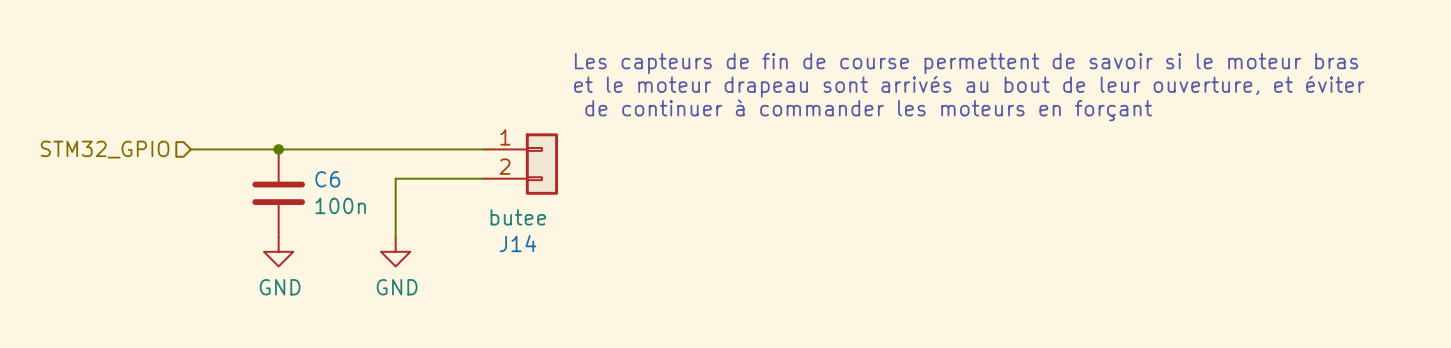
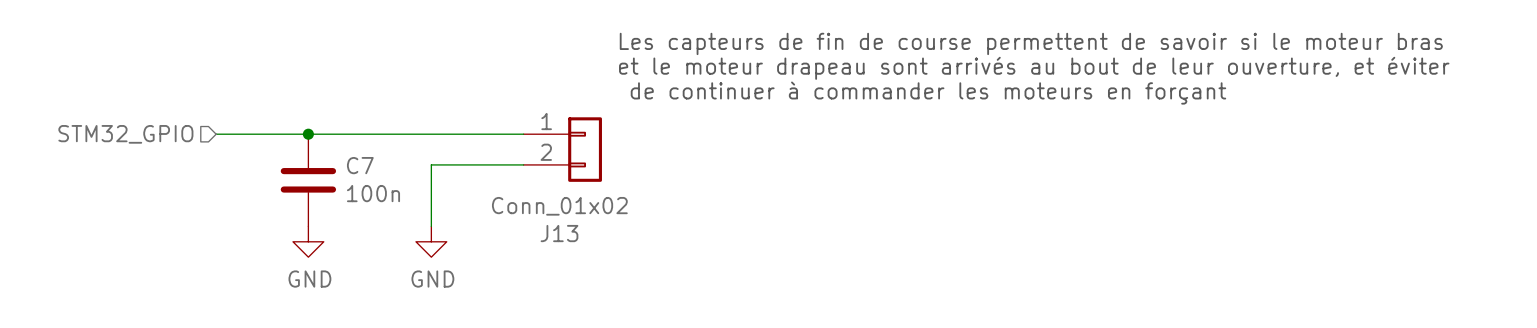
C6 name: C6 (327, 179) -> C7 (360, 165)
J14 value: butee (518, 217) -> Conn_01x02 (559, 206)
J14 name: J14 (517, 243) -> J13 (559, 233)

